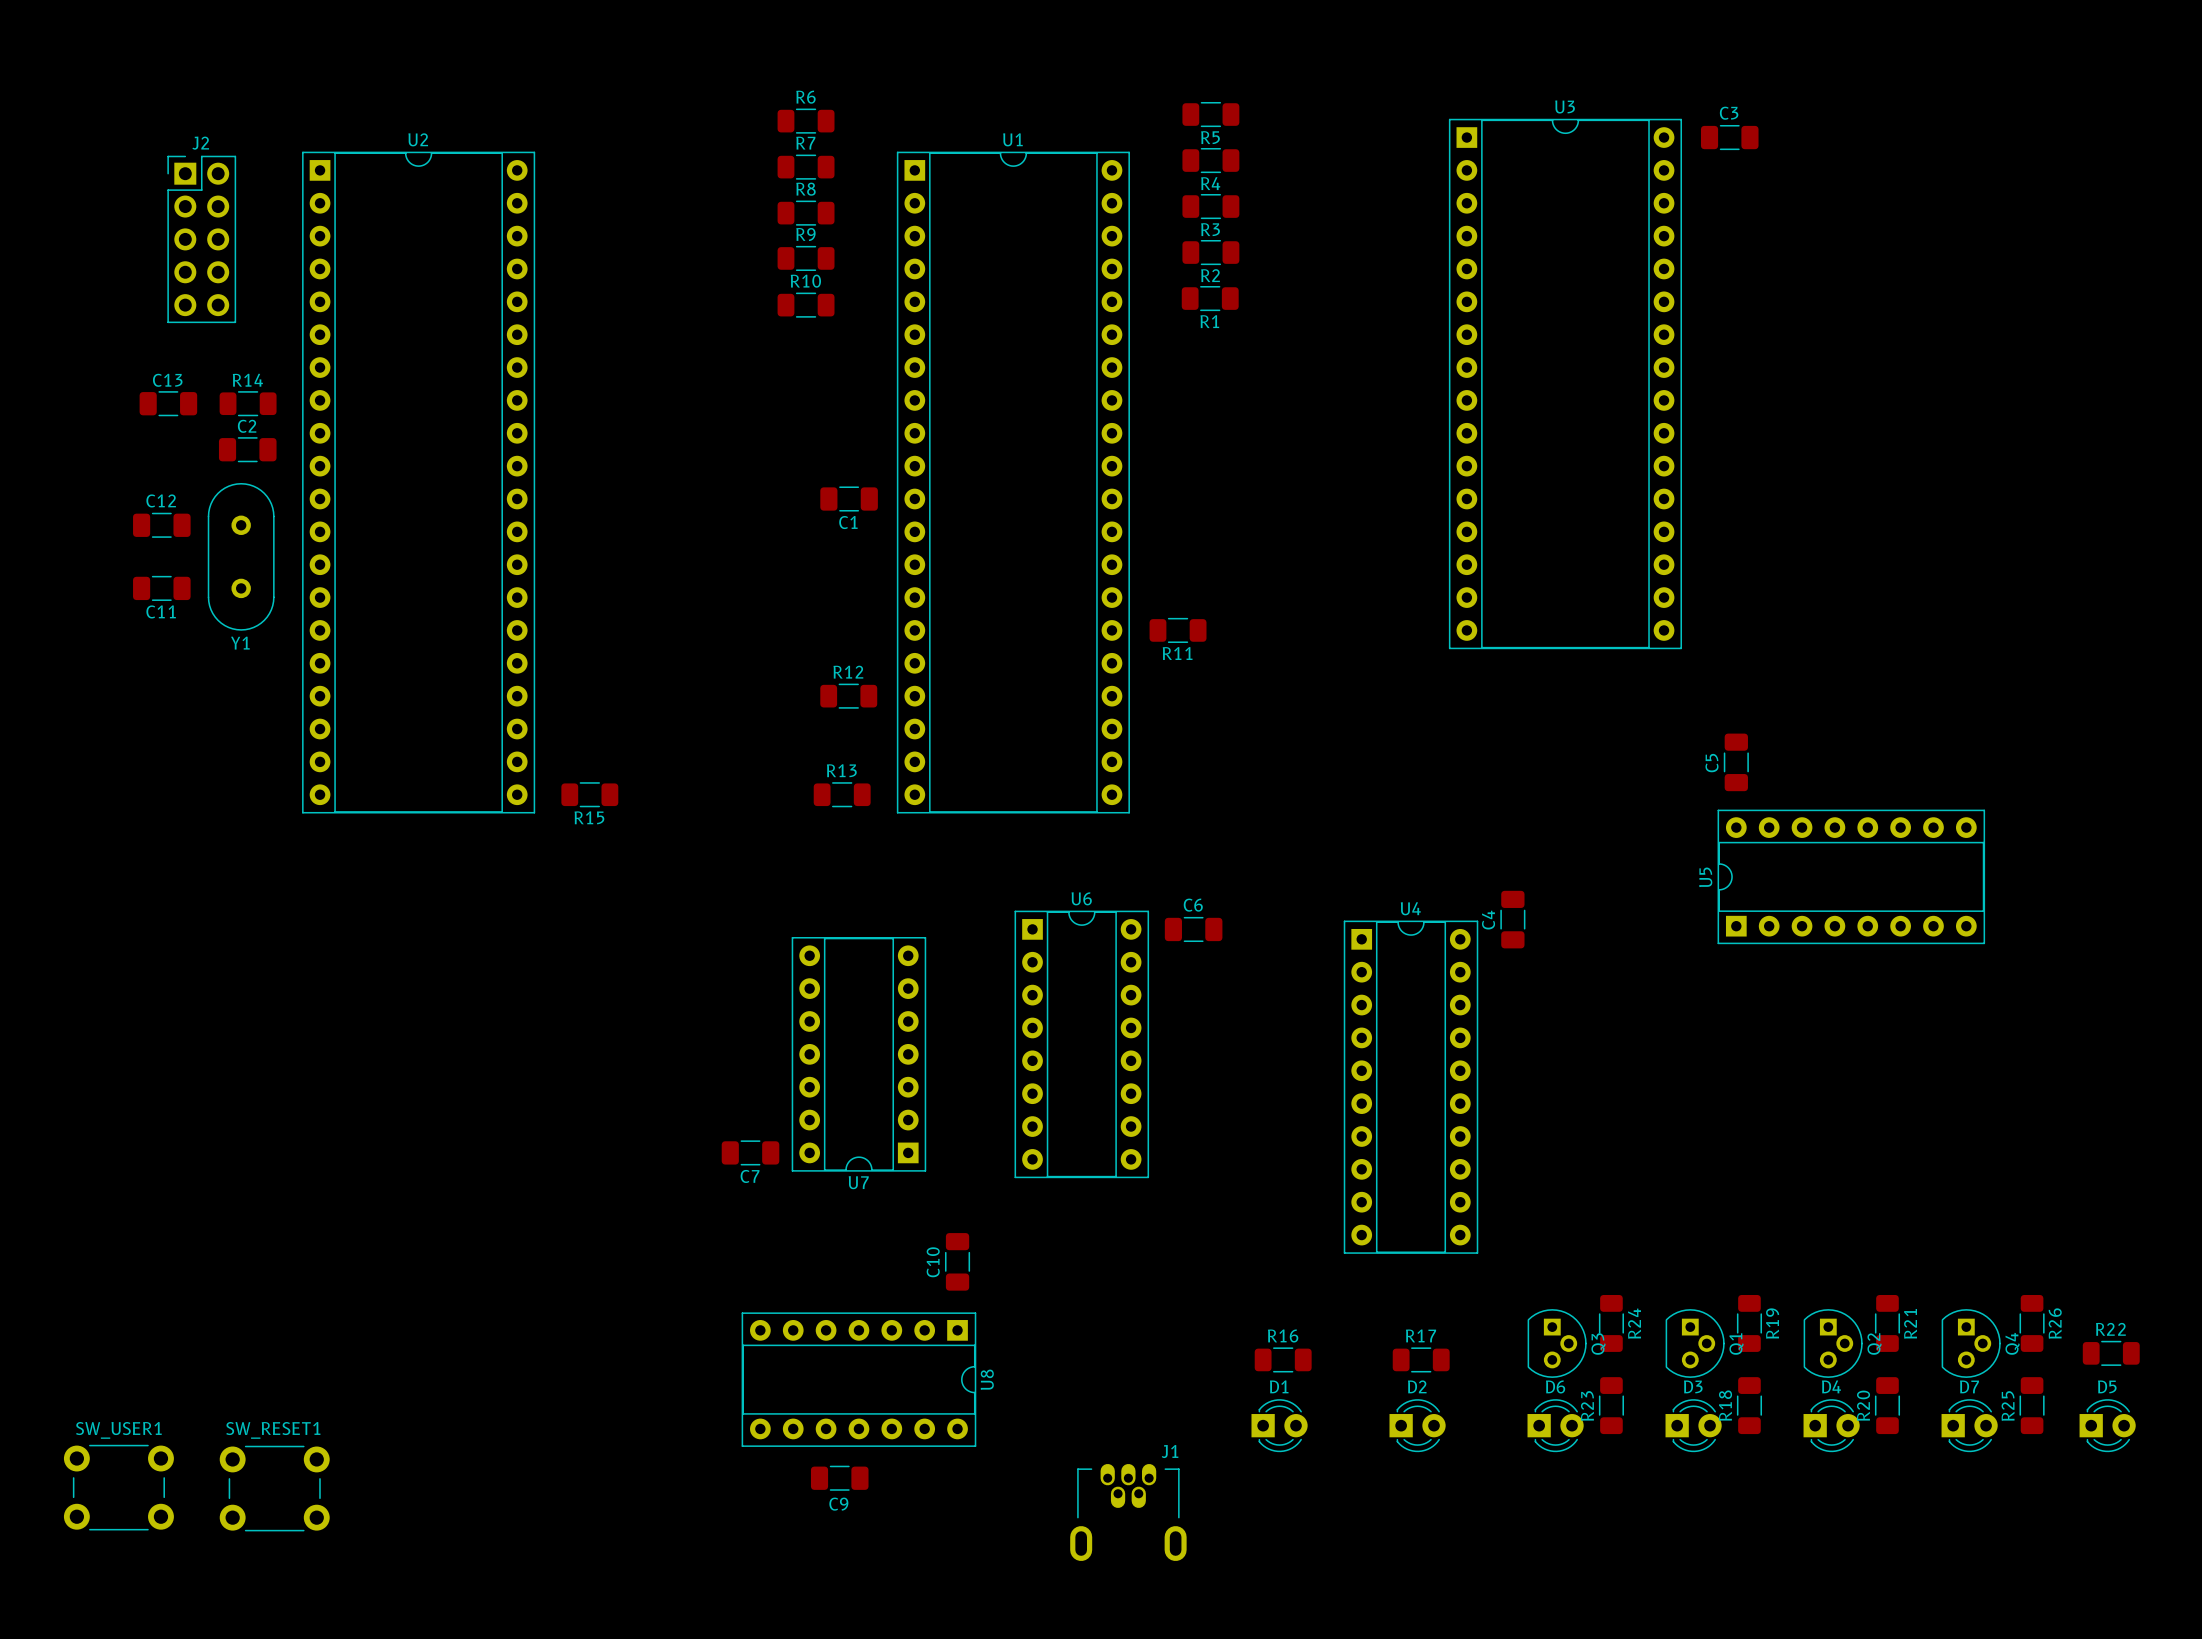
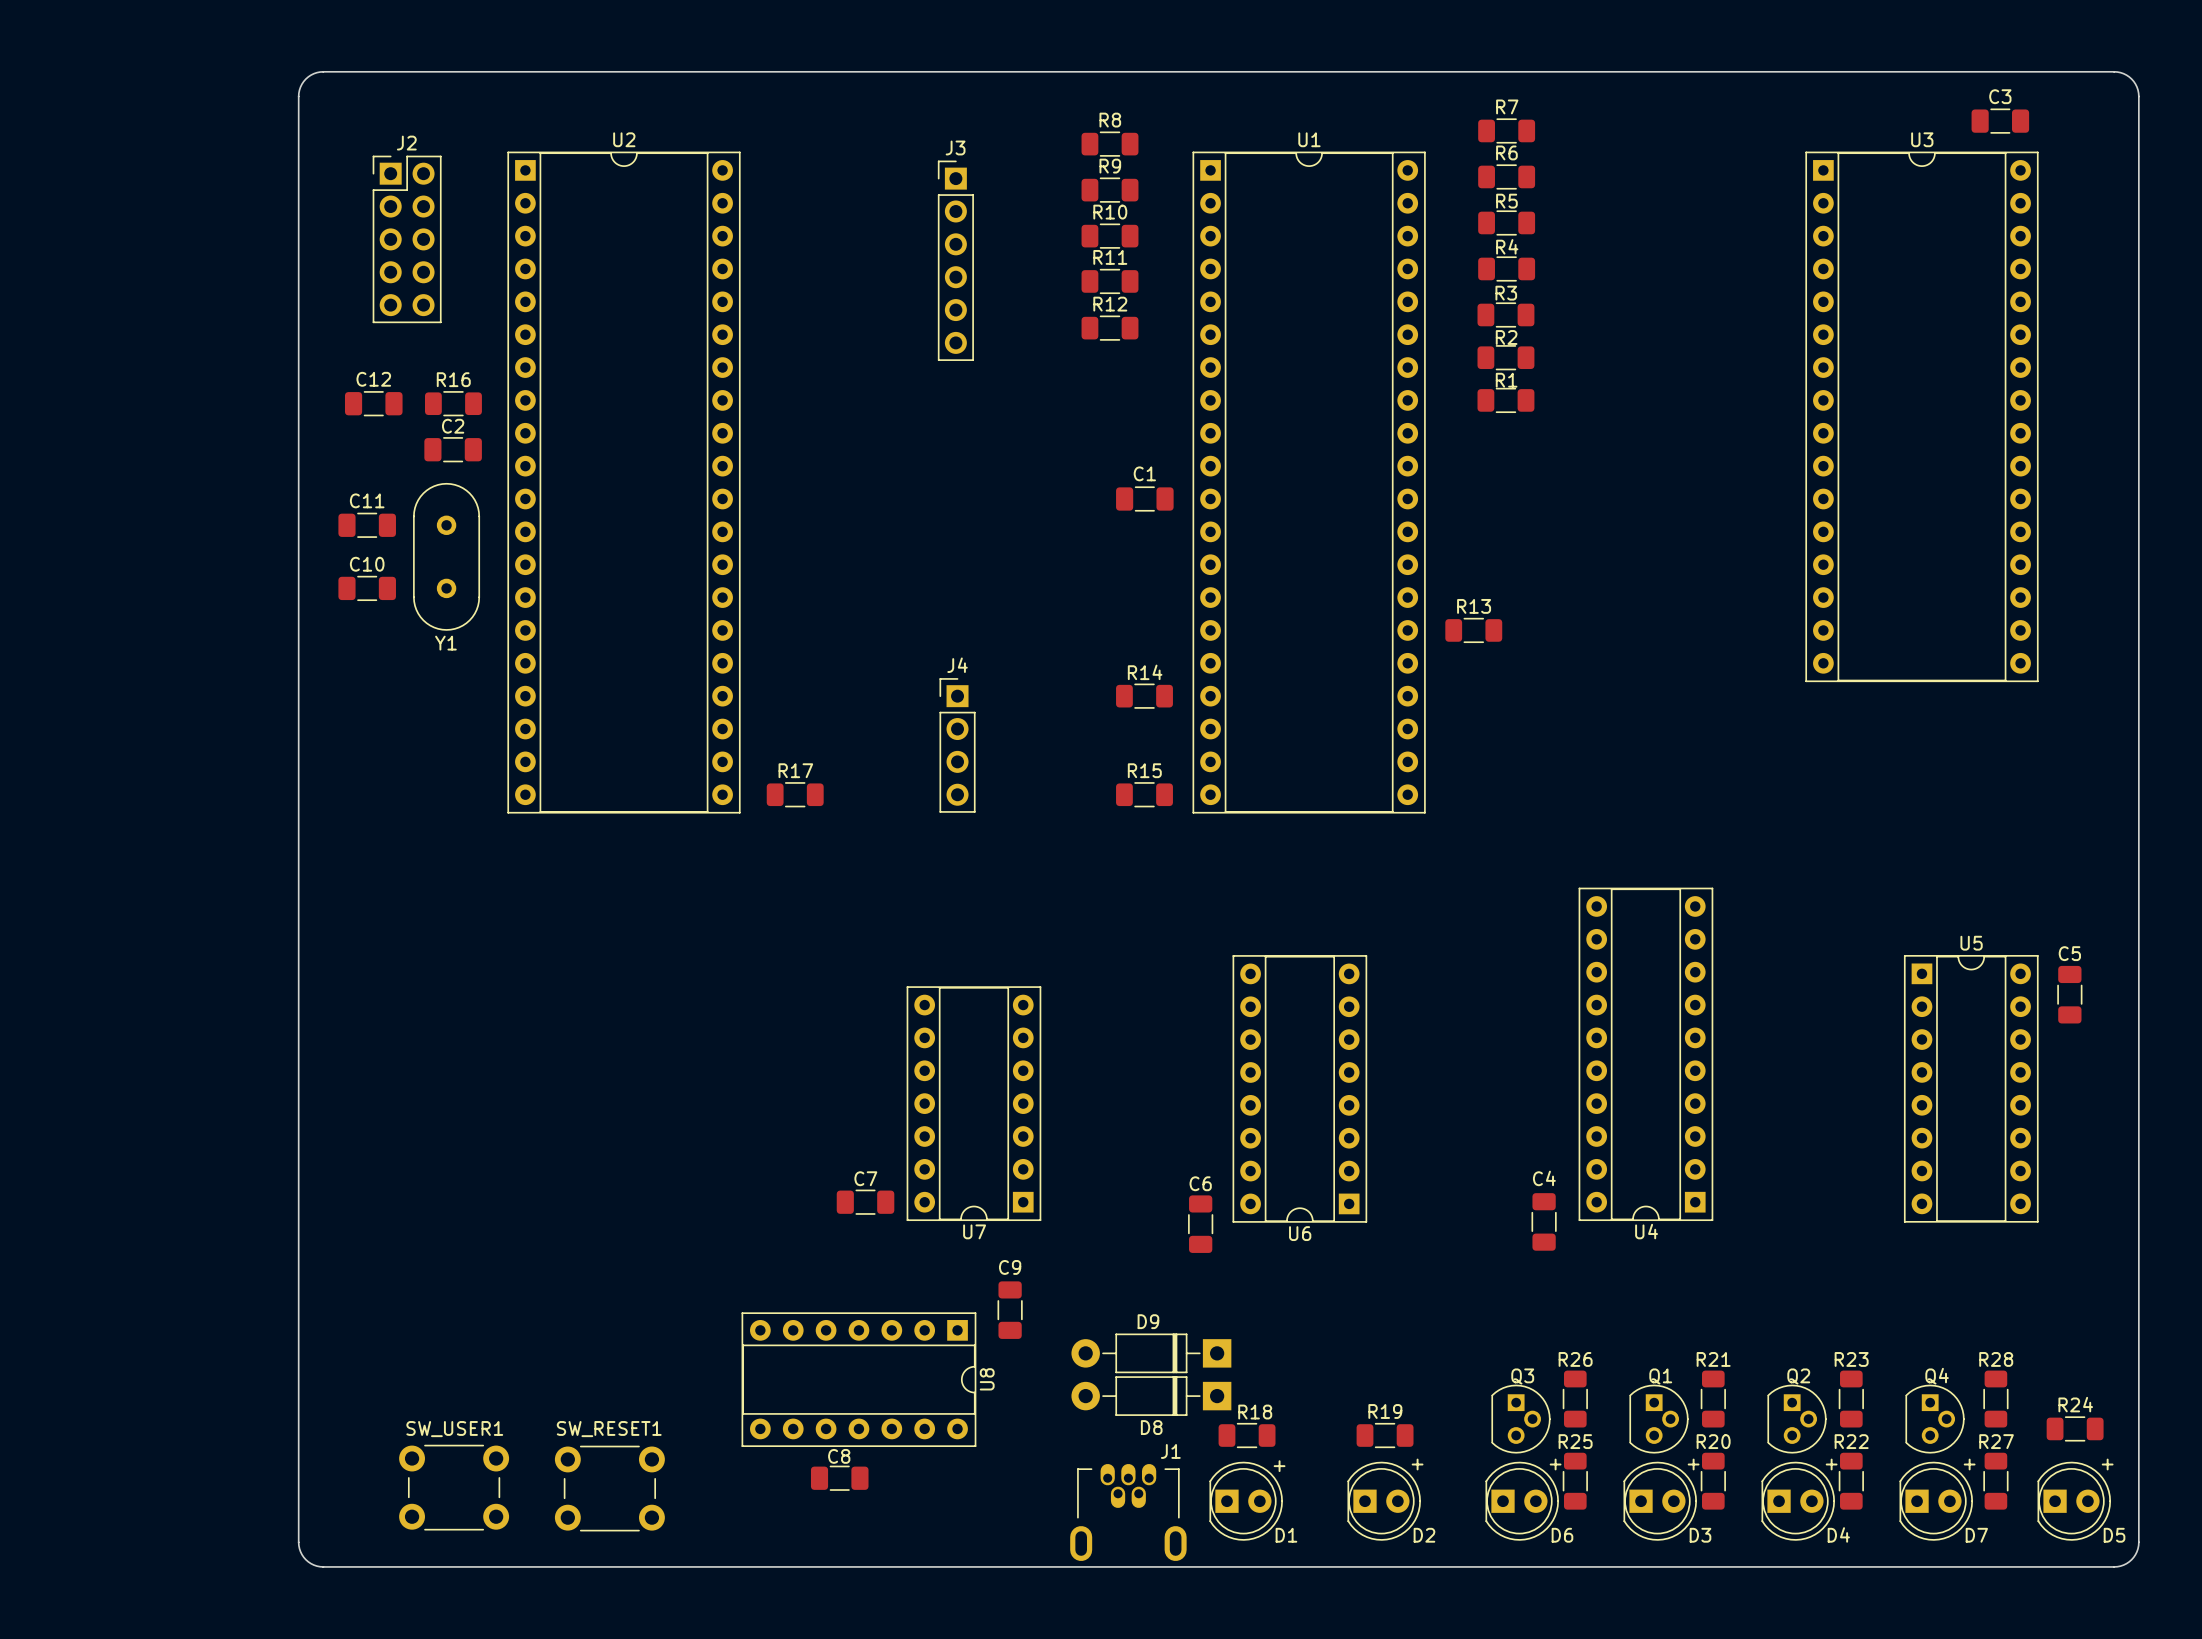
board edge: none -> (323, 71) (2114, 71) (2129, 76) (2135, 84) (2138, 96) (2138, 1542) (2133, 1557) (2123, 1565) (2114, 1566) (323, 1566) (308, 1561) (300, 1551) (298, 1542) (298, 96) (300, 87) (305, 79) (313, 73) (323, 71)
R5 position: (1210, 114) -> (1506, 222)
R6 position: (806, 121) -> (1506, 176)
R5 name position: R5 (1210, 137) -> R5 (1506, 201)
C3 position: (1729, 137) -> (2000, 121)
R4 position: (1210, 160) -> (1506, 268)
R7 position: (806, 167) -> (1506, 130)
R4 name position: R4 (1210, 183) -> R4 (1507, 246)
R3 position: (1210, 206) -> (1505, 314)
R8 position: (806, 213) -> (1109, 144)
R3 name position: R3 (1210, 229) -> R3 (1506, 293)
J2 position: (201, 239) -> (407, 239)
R2 position: (1210, 252) -> (1505, 357)
R9 position: (806, 258) -> (1109, 190)
J3: none -> (955, 260)
R2 name position: R2 (1210, 275) -> R2 (1506, 337)
R1 position: (1210, 298) -> (1505, 400)
R10 position: (806, 305) -> (1109, 236)
R1 name position: R1 (1209, 321) -> R1 (1506, 380)
U3 position: (1565, 383) -> (1921, 416)
C13: (168, 403) -> none
R14 position: (248, 403) -> (1144, 696)
C2 position: (247, 449) -> (453, 449)
U2 position: (418, 482) -> (624, 482)
U1 position: (1013, 482) -> (1309, 482)
C1 position: (849, 499) -> (1144, 499)
C1 name position: C1 (848, 522) -> C1 (1144, 473)
C12 position: (161, 525) -> (373, 403)
Y1 position: (241, 556) -> (446, 556)
C11 position: (161, 588) -> (367, 525)
C11 name position: C11 (161, 611) -> C11 (367, 500)
R11 position: (1178, 630) -> (1109, 281)
R11 name position: R11 (1177, 653) -> R11 (1110, 257)
R12 position: (848, 696) -> (1109, 328)
J4: none -> (957, 745)
C5 position: (1736, 762) -> (2069, 994)
C5 name rotation: 0° (1711, 763) -> 90° clockwise (2069, 953)
C5 name position: C5 (1711, 763) -> C5 (2069, 953)
R15 position: (589, 794) -> (1144, 794)
R13 position: (842, 794) -> (1473, 630)
R15 name position: R15 (589, 817) -> R15 (1144, 770)
U5 rotation: 0° (1851, 876) -> 90° clockwise (1971, 1088)
U5 position: (1851, 876) -> (1971, 1088)
C4 position: (1512, 919) -> (1544, 1221)
C4 name rotation: 0° (1488, 920) -> 90° clockwise (1544, 1178)
C4 name position: C4 (1488, 920) -> C4 (1544, 1178)
C6 rotation: 0° (1193, 929) -> 90° clockwise (1200, 1224)
C6 position: (1193, 929) -> (1200, 1224)
U6 rotation: 0° (1081, 1044) -> 180° (1299, 1088)
U6 position: (1081, 1044) -> (1299, 1088)
U7 position: (858, 1054) -> (973, 1103)
U4 rotation: 0° (1411, 1087) -> 180° (1645, 1054)
U4 position: (1411, 1087) -> (1645, 1054)
C7 position: (750, 1152) -> (865, 1202)
C7 name position: C7 (750, 1176) -> C7 (865, 1178)
C10 rotation: 0° (957, 1261) -> 90° clockwise (367, 588)
C10 position: (957, 1261) -> (367, 588)
C9: none -> (1010, 1310)
R24 rotation: 0° (1611, 1323) -> 90° clockwise (2075, 1428)
R24 position: (1611, 1323) -> (2075, 1428)
R24 name position: R24 (1634, 1323) -> R24 (2075, 1404)
R19 rotation: 0° (1749, 1323) -> 90° clockwise (1385, 1435)
R19 position: (1749, 1323) -> (1385, 1435)
R19 name position: R19 (1772, 1323) -> R19 (1385, 1411)
R21 position: (1887, 1323) -> (1713, 1399)
R21 name rotation: 0° (1910, 1323) -> 90° clockwise (1713, 1359)
R21 name position: R21 (1910, 1323) -> R21 (1713, 1359)
R26 position: (2032, 1323) -> (1575, 1399)
R26 name rotation: 0° (2055, 1323) -> 90° clockwise (1575, 1359)
R26 name position: R26 (2055, 1323) -> R26 (1575, 1359)
Q3 position: (1557, 1343) -> (1521, 1419)
Q1 position: (1695, 1343) -> (1659, 1419)
Q2 position: (1833, 1343) -> (1797, 1419)
Q4 position: (1971, 1343) -> (1935, 1419)
Q4 name rotation: 0° (2012, 1343) -> 90° clockwise (1937, 1376)
Q4 name position: Q4 (2012, 1343) -> Q4 (1937, 1376)
Q3 name rotation: 0° (1598, 1344) -> 90° clockwise (1522, 1376)
Q3 name position: Q3 (1598, 1344) -> Q3 (1522, 1376)
Q1 name rotation: 0° (1736, 1344) -> 90° clockwise (1660, 1376)
Q1 name position: Q1 (1736, 1344) -> Q1 (1660, 1376)
Q2 name rotation: 0° (1874, 1344) -> 90° clockwise (1798, 1376)
Q2 name position: Q2 (1874, 1344) -> Q2 (1798, 1376)
D9: none -> (1151, 1353)
R22 rotation: 0° (2111, 1353) -> 90° clockwise (1851, 1481)
R22 position: (2111, 1353) -> (1851, 1481)
R16 position: (1283, 1359) -> (453, 403)
R17 position: (1421, 1359) -> (795, 794)
D1 name position: D1 (1279, 1386) -> D1 (1286, 1535)
D2 name position: D2 (1417, 1386) -> D2 (1424, 1535)
D6 name position: D6 (1555, 1386) -> D6 (1562, 1535)
D3 name position: D3 (1693, 1386) -> D3 (1700, 1535)
D4 name position: D4 (1831, 1386) -> D4 (1838, 1534)
D7 name position: D7 (1969, 1386) -> D7 (1976, 1535)
D5 name position: D5 (2107, 1386) -> D5 (2114, 1535)
D8: none -> (1151, 1396)
D1 footprint: [1251, 1399, 1308, 1453] -> [1209, 1461, 1283, 1541]
D2 footprint: [1389, 1399, 1446, 1453] -> [1347, 1461, 1421, 1541]
D6 footprint: [1527, 1399, 1584, 1453] -> [1485, 1461, 1559, 1541]
D3 footprint: [1665, 1399, 1722, 1453] -> [1623, 1461, 1697, 1541]
D4 footprint: [1803, 1399, 1860, 1453] -> [1761, 1461, 1835, 1541]
D7 footprint: [1941, 1399, 1998, 1453] -> [1899, 1461, 1973, 1541]
R28: none -> (1995, 1399)
D5 footprint: [2079, 1399, 2136, 1453] -> [2037, 1461, 2111, 1541]
R23 name rotation: 0° (1587, 1405) -> 90° clockwise (1851, 1359)
R23 name position: R23 (1587, 1405) -> R23 (1851, 1359)
R23 position: (1611, 1405) -> (1851, 1399)
R18 rotation: 0° (1749, 1405) -> 90° clockwise (1247, 1435)
R18 position: (1749, 1405) -> (1247, 1435)
R20 name rotation: 0° (1863, 1405) -> 90° clockwise (1713, 1441)
R20 name position: R20 (1863, 1405) -> R20 (1713, 1441)
R20 position: (1887, 1405) -> (1713, 1481)
R25 position: (2032, 1405) -> (1575, 1481)
R25 name rotation: 0° (2008, 1406) -> 90° clockwise (1575, 1441)
R25 name position: R25 (2008, 1406) -> R25 (1575, 1441)
text: none -> + (1417, 1464)
text: none -> + (1555, 1464)
text: none -> + (1693, 1464)
text: none -> + (1831, 1464)
text: none -> + (1969, 1464)
text: none -> + (2107, 1464)
text: none -> + (1279, 1466)
R27: none -> (1995, 1481)
SW_USER1 position: (118, 1487) -> (454, 1487)
SW_RESET1 position: (274, 1488) -> (609, 1488)
C9 name: C9 (838, 1504) -> C8 (839, 1456)

